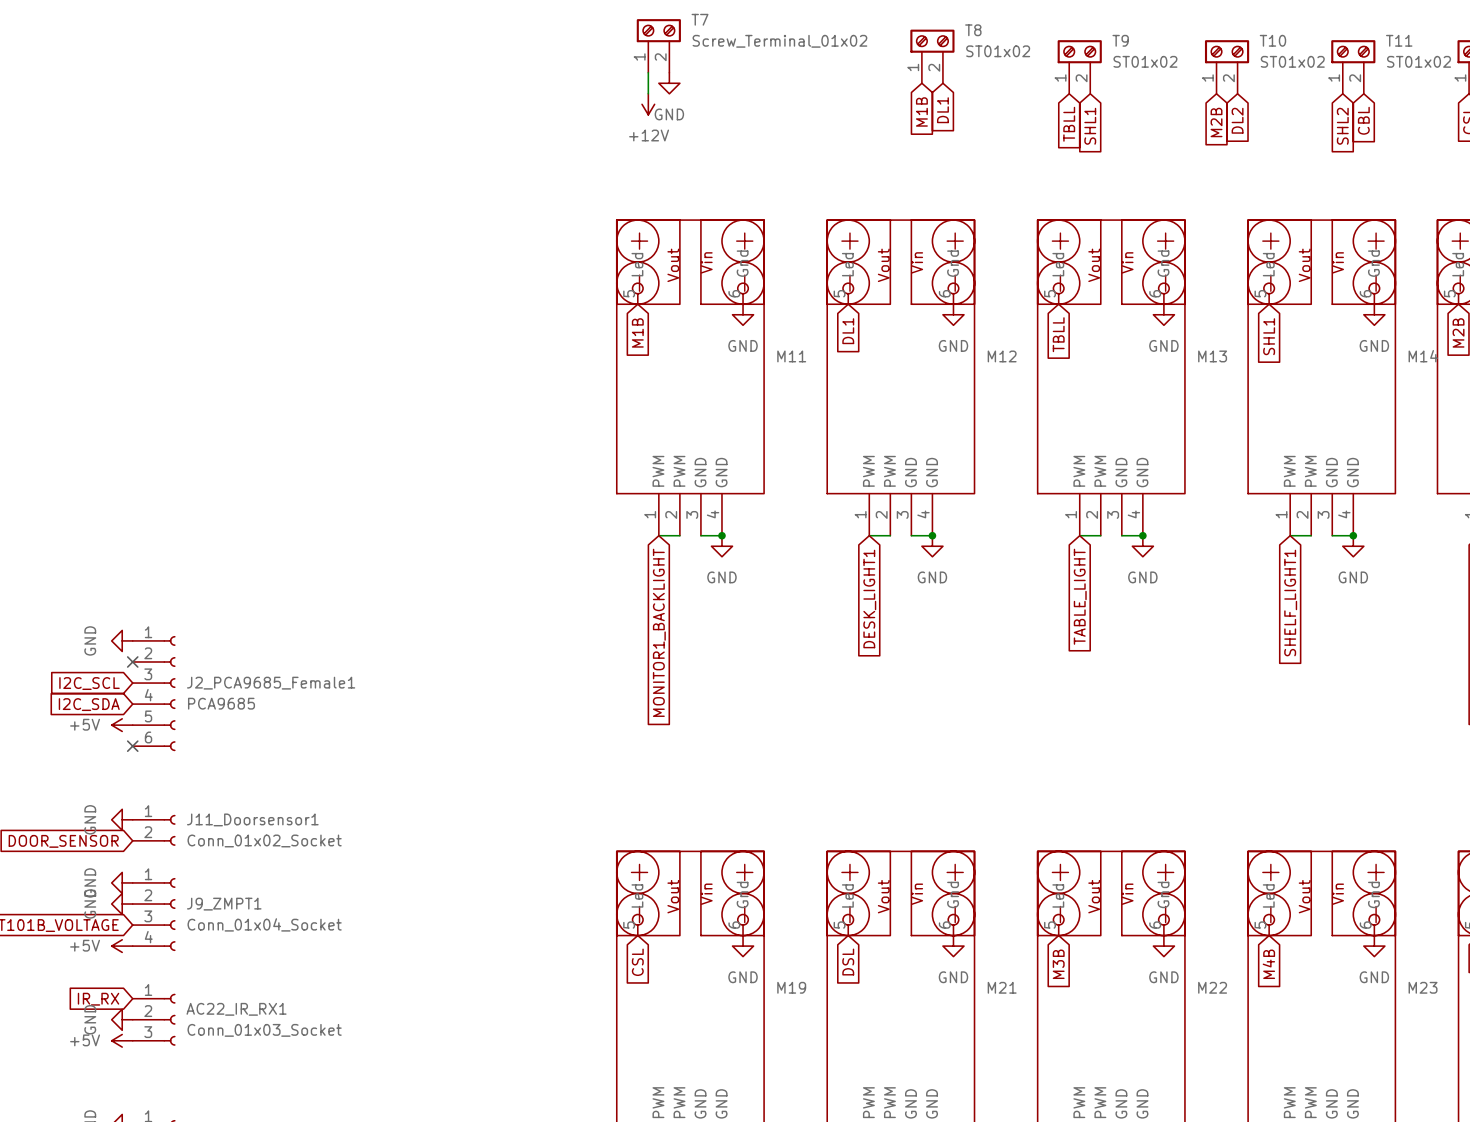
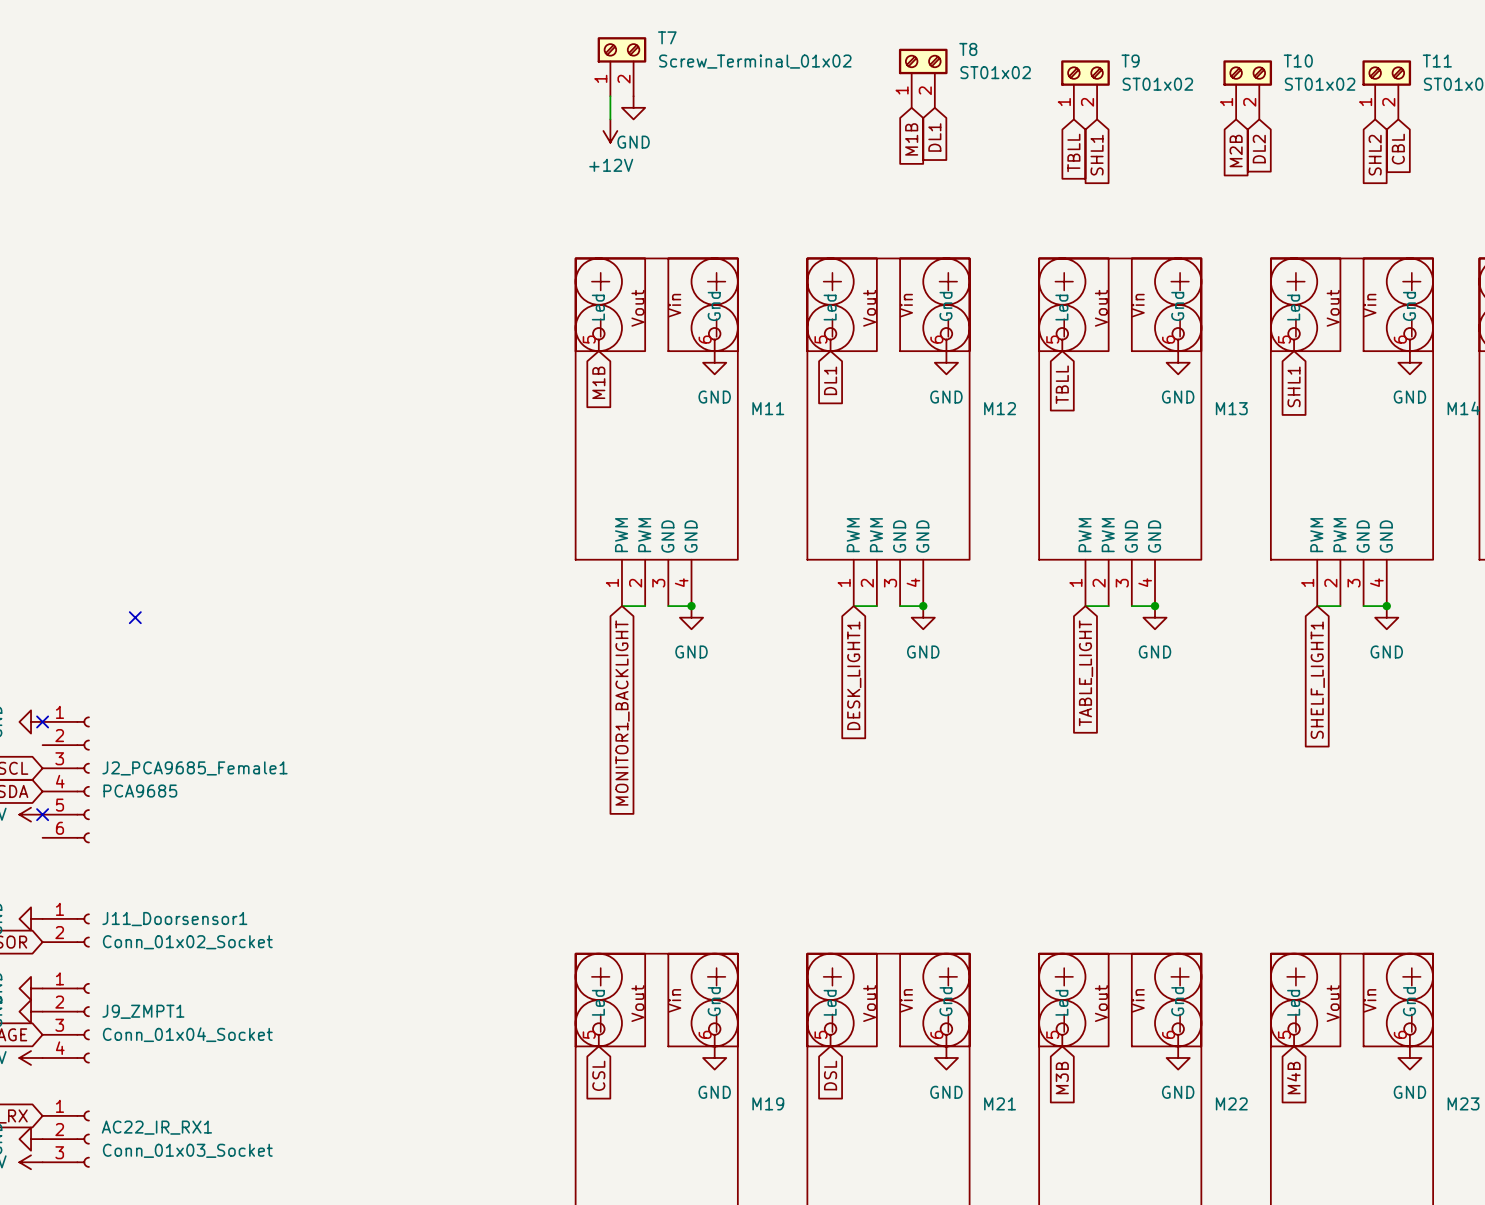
no-connect mark: none -> (135, 617)
no-connect mark position: (132, 661) -> (42, 721)
no-connect mark position: (132, 746) -> (42, 814)

